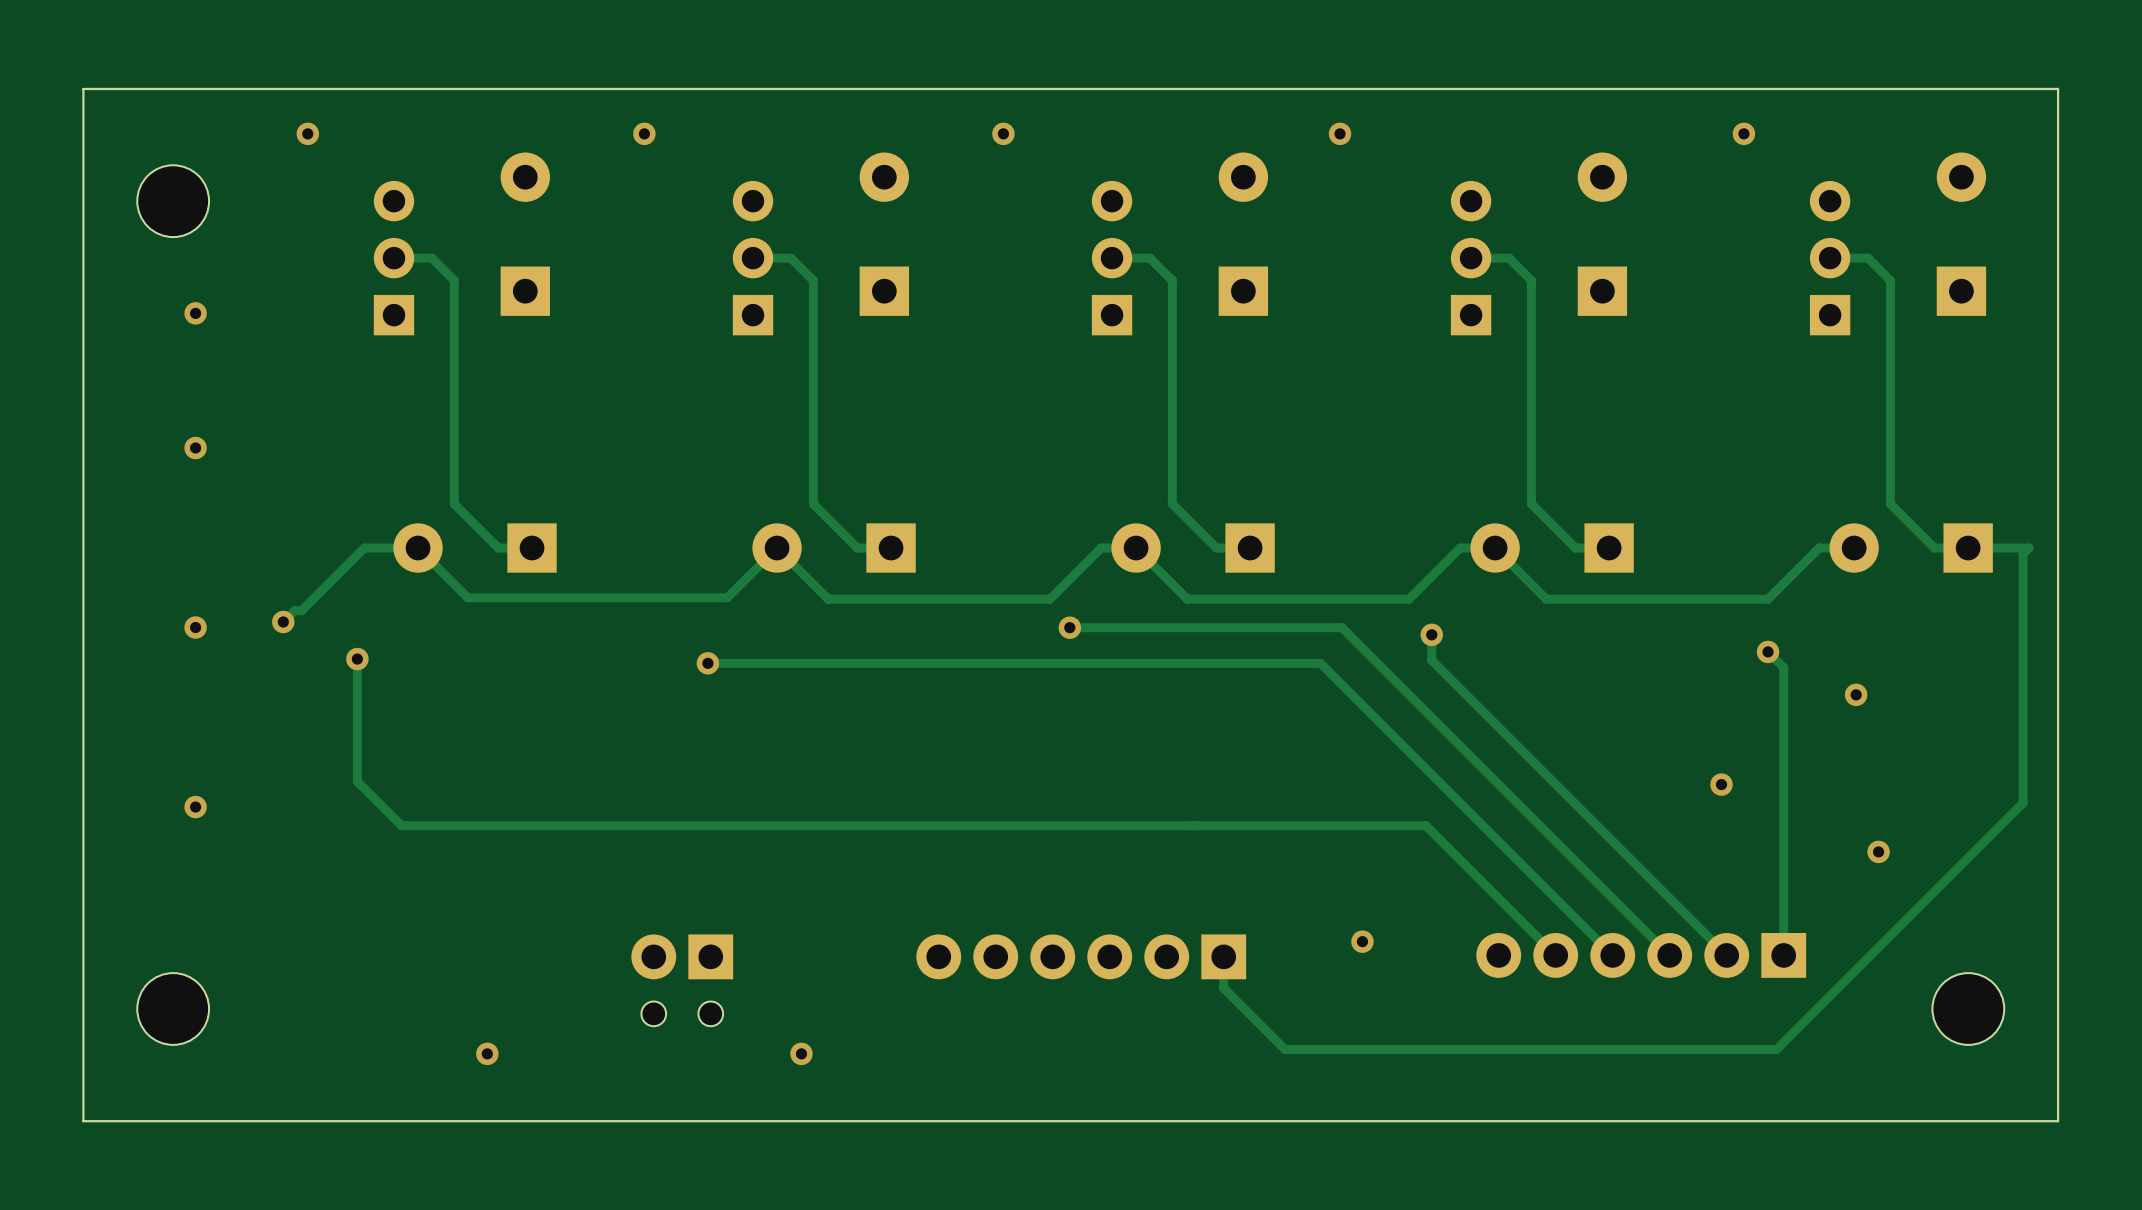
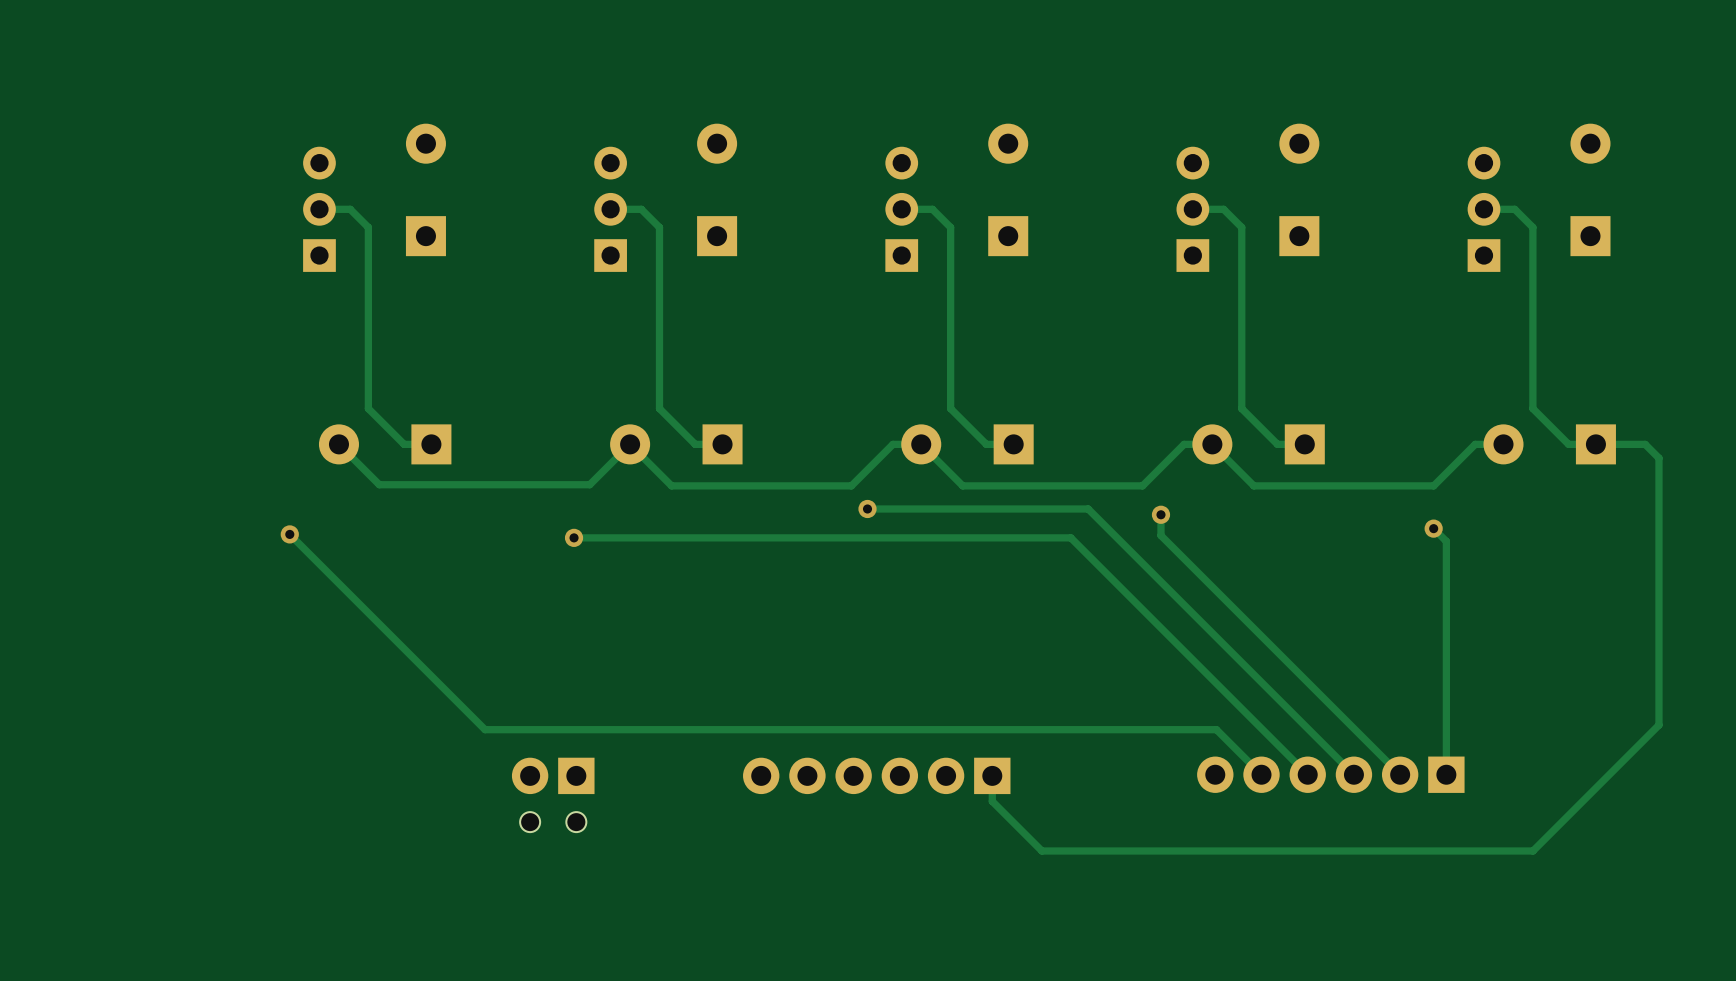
board edge: (2058, 88) (83, 88) (83, 1121) (2058, 1121) (2058, 88) -> none
via: (307, 133) -> none
via: (644, 133) -> none
via: (1003, 133) -> none
via: (1340, 133) -> none
via: (1743, 133) -> none
part: (173, 201) -> none
via: (195, 313) -> none
via: (195, 448) -> none
track: (418, 548) (364, 548) (301, 610) (294, 610) (283, 622) -> none
track: (2028, 548) (2023, 553) (2023, 802) (1776, 1049) -> (1645, 444) (1658, 458) (1658, 725) (1533, 850) (1440, 850)
via: (283, 622) -> none
via: (195, 627) -> none
track: (357, 659) (357, 781) (401, 825) (1426, 825) (1500, 899) -> (289, 534) (485, 729) (1216, 729)
via: (1856, 694) -> none
via: (1721, 784) -> none
via: (195, 807) -> none
via: (1878, 851) -> none
via: (1362, 941) -> none
part: (173, 1008) -> none
part: (1968, 1008) -> none
via: (487, 1053) -> none
via: (801, 1053) -> none

